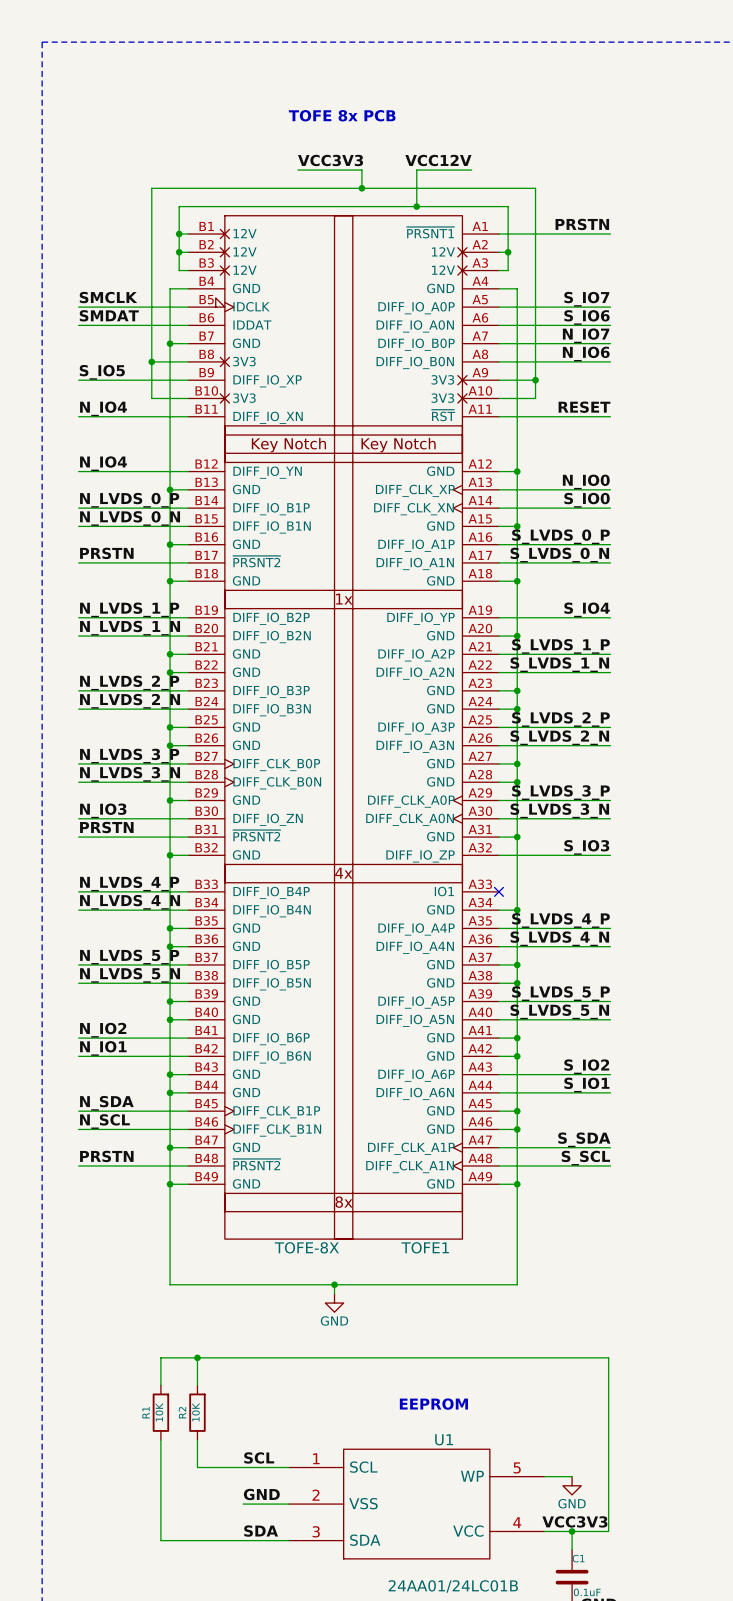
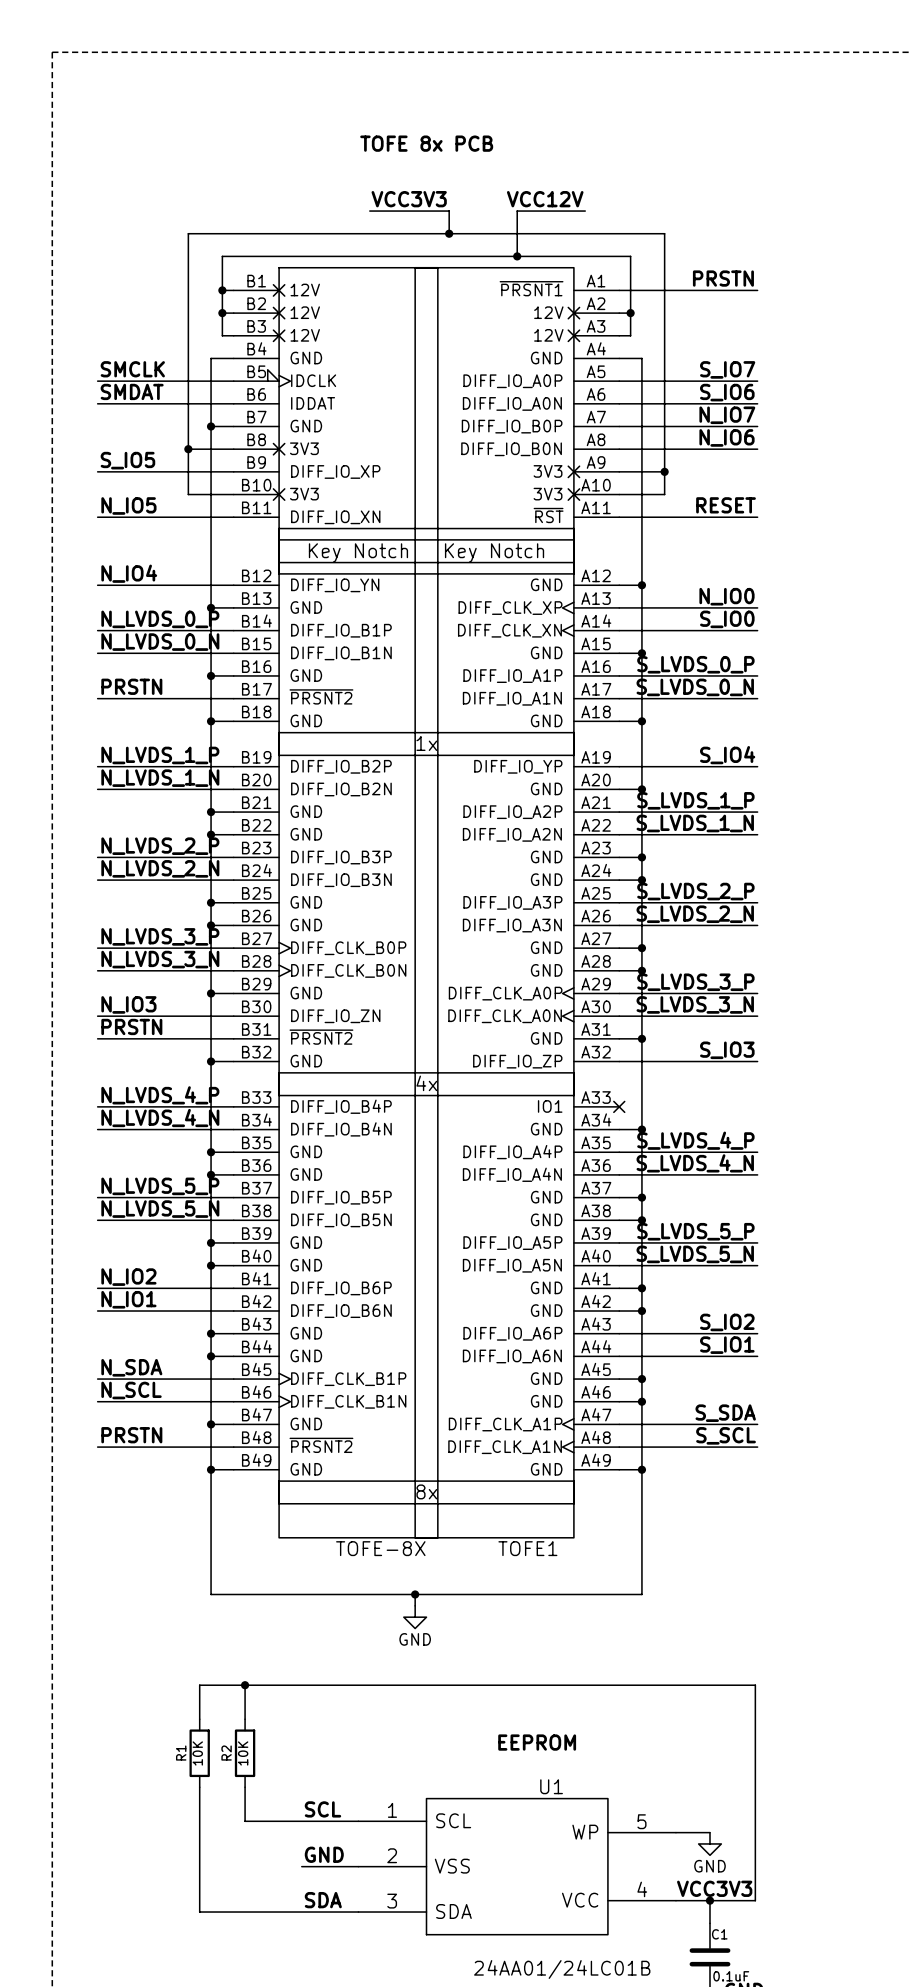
label: N_IO4 (103, 408) -> N_IO5 (128, 505)

